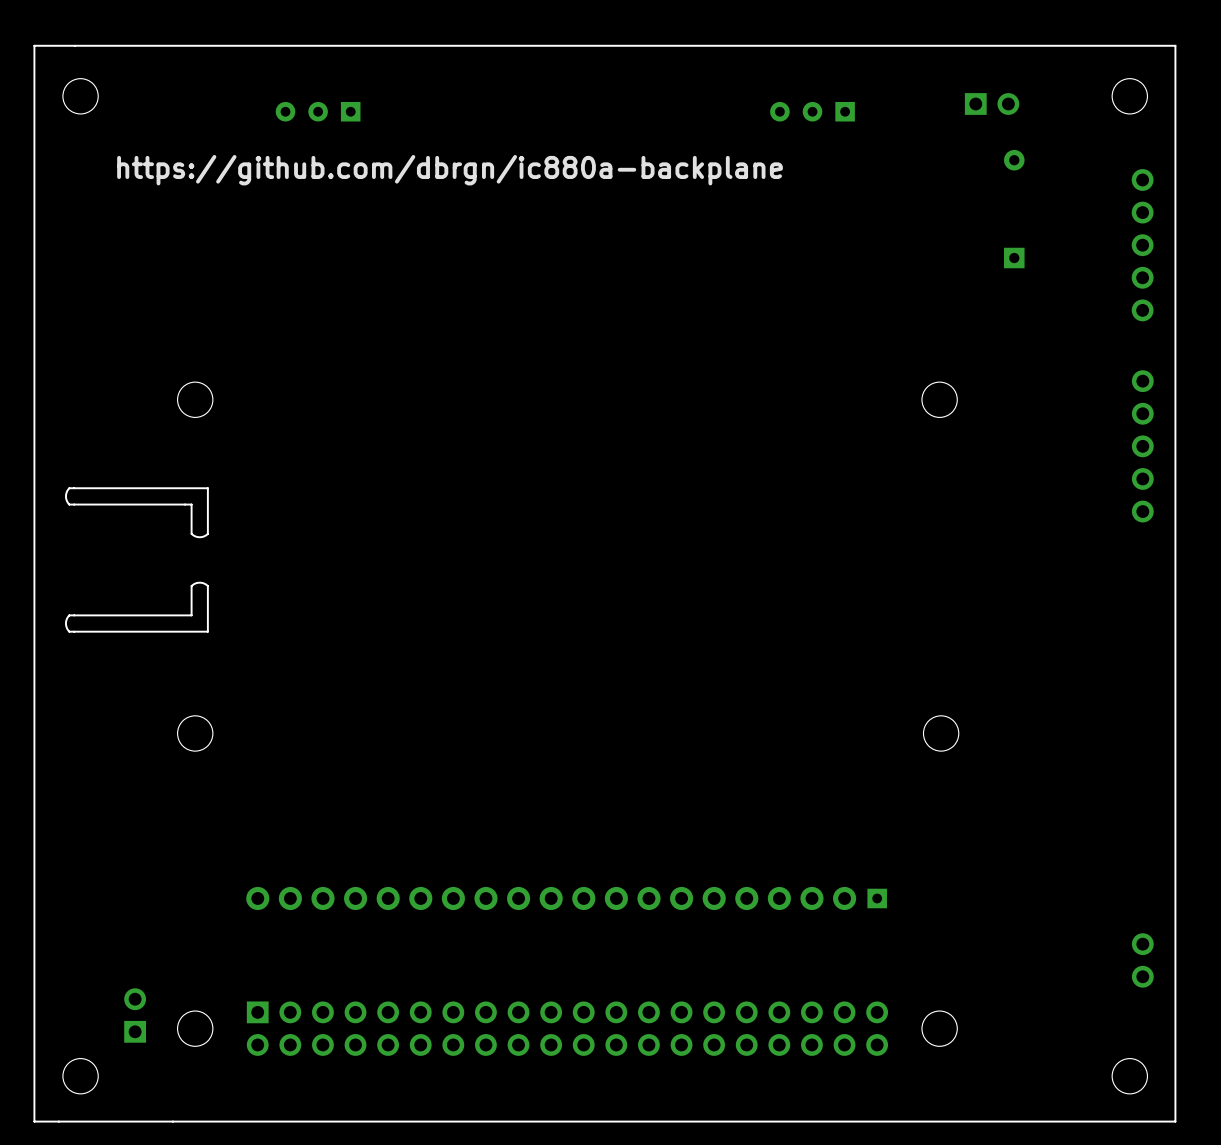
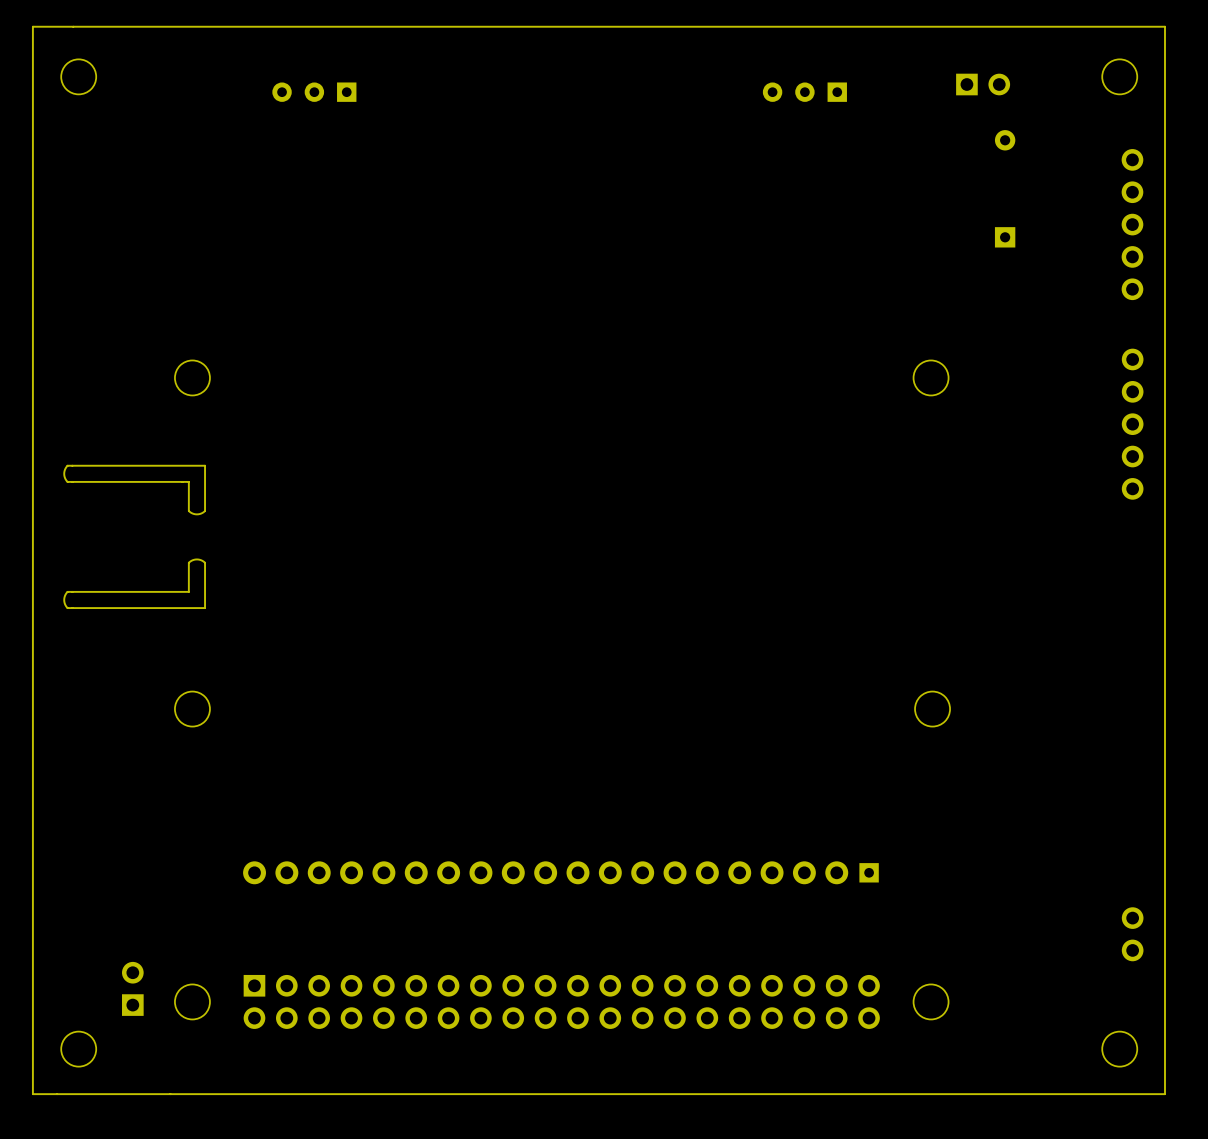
text: https://github.com/dbrgn/ic880a-backplane (450, 170) -> none

